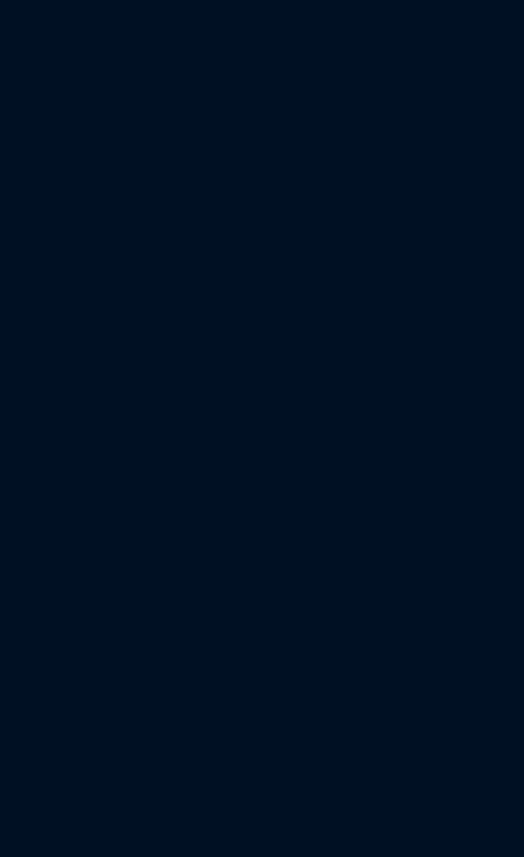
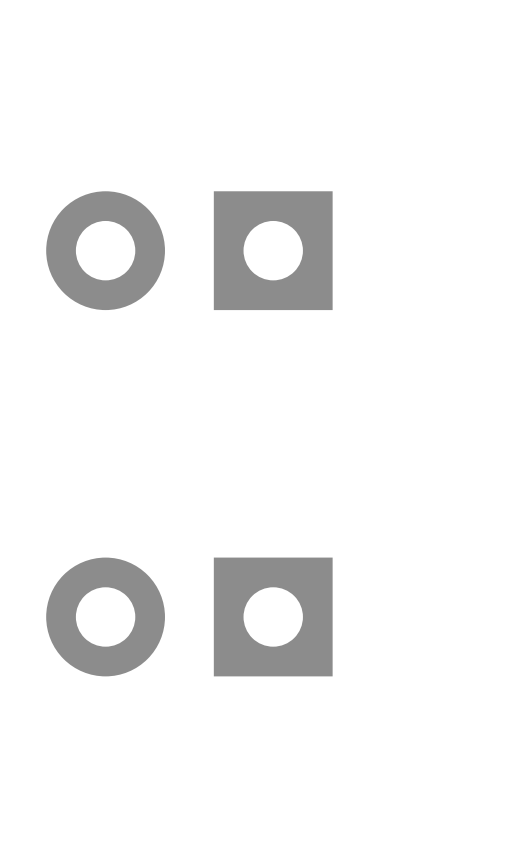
part: none -> (189, 250)
part: none -> (189, 616)

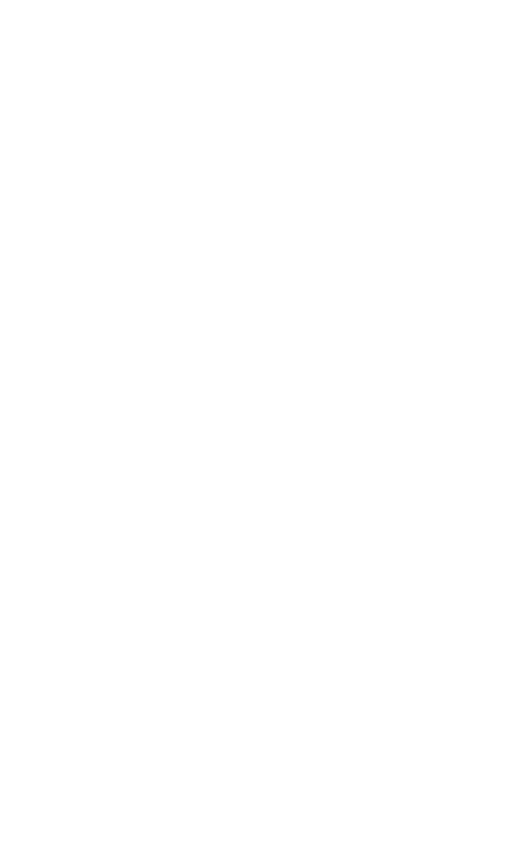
part: (189, 250) -> none
part: (189, 616) -> none

